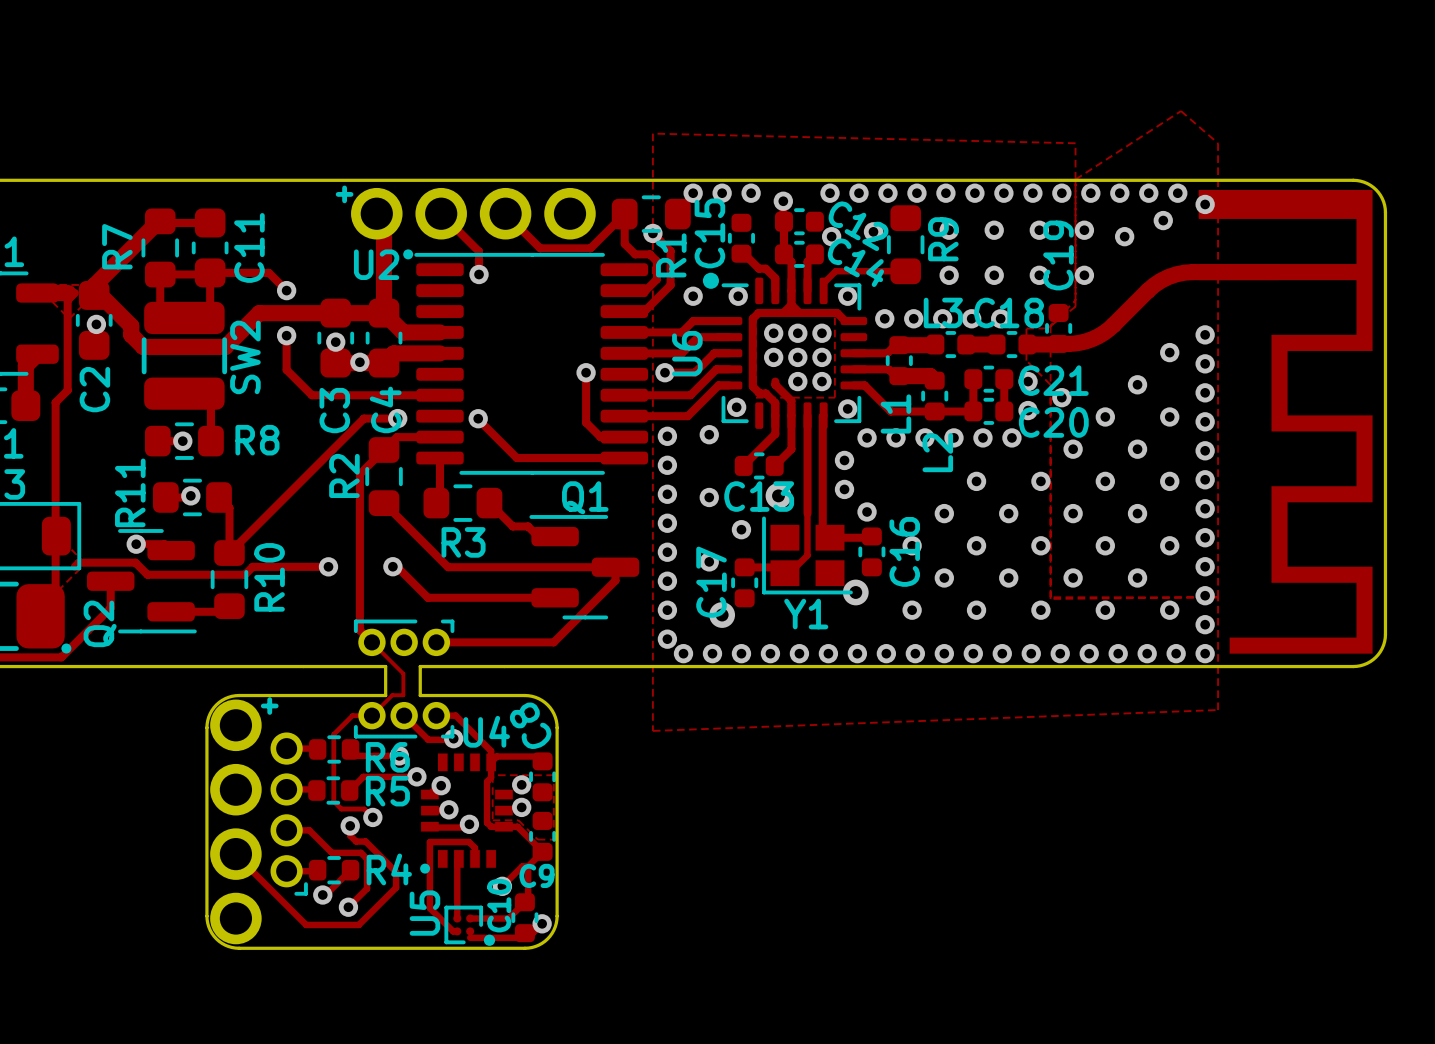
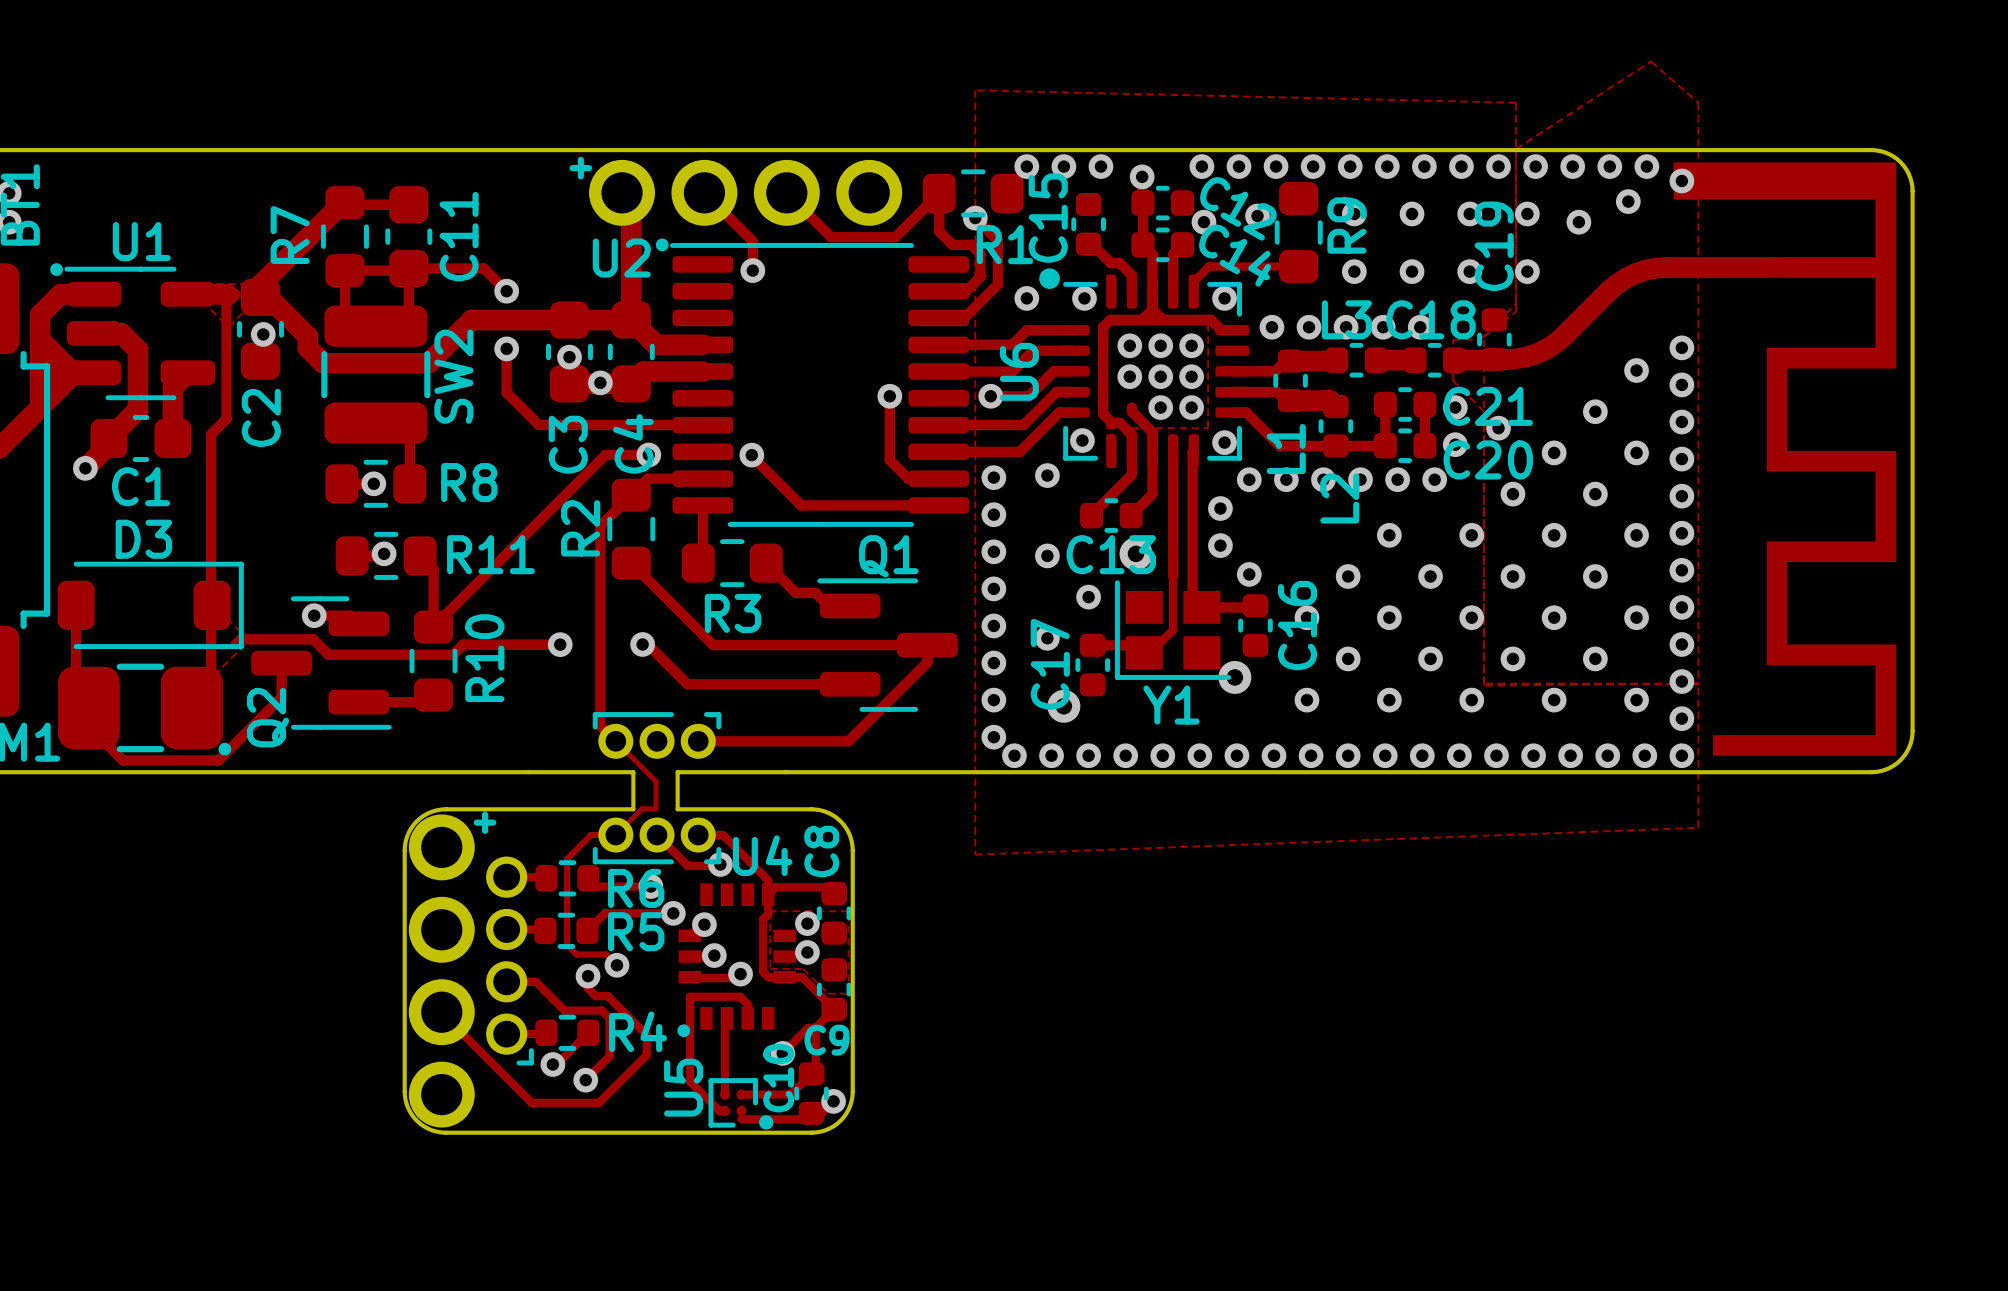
R1 name rotation: 0° (671, 255) -> 90° clockwise (1004, 244)
R11 name rotation: 0° (130, 492) -> 90° clockwise (490, 554)
R11 name position: R11 (130, 492) -> R11 (490, 554)
C8 name rotation: 0° (530, 725) -> 30° clockwise (821, 851)

